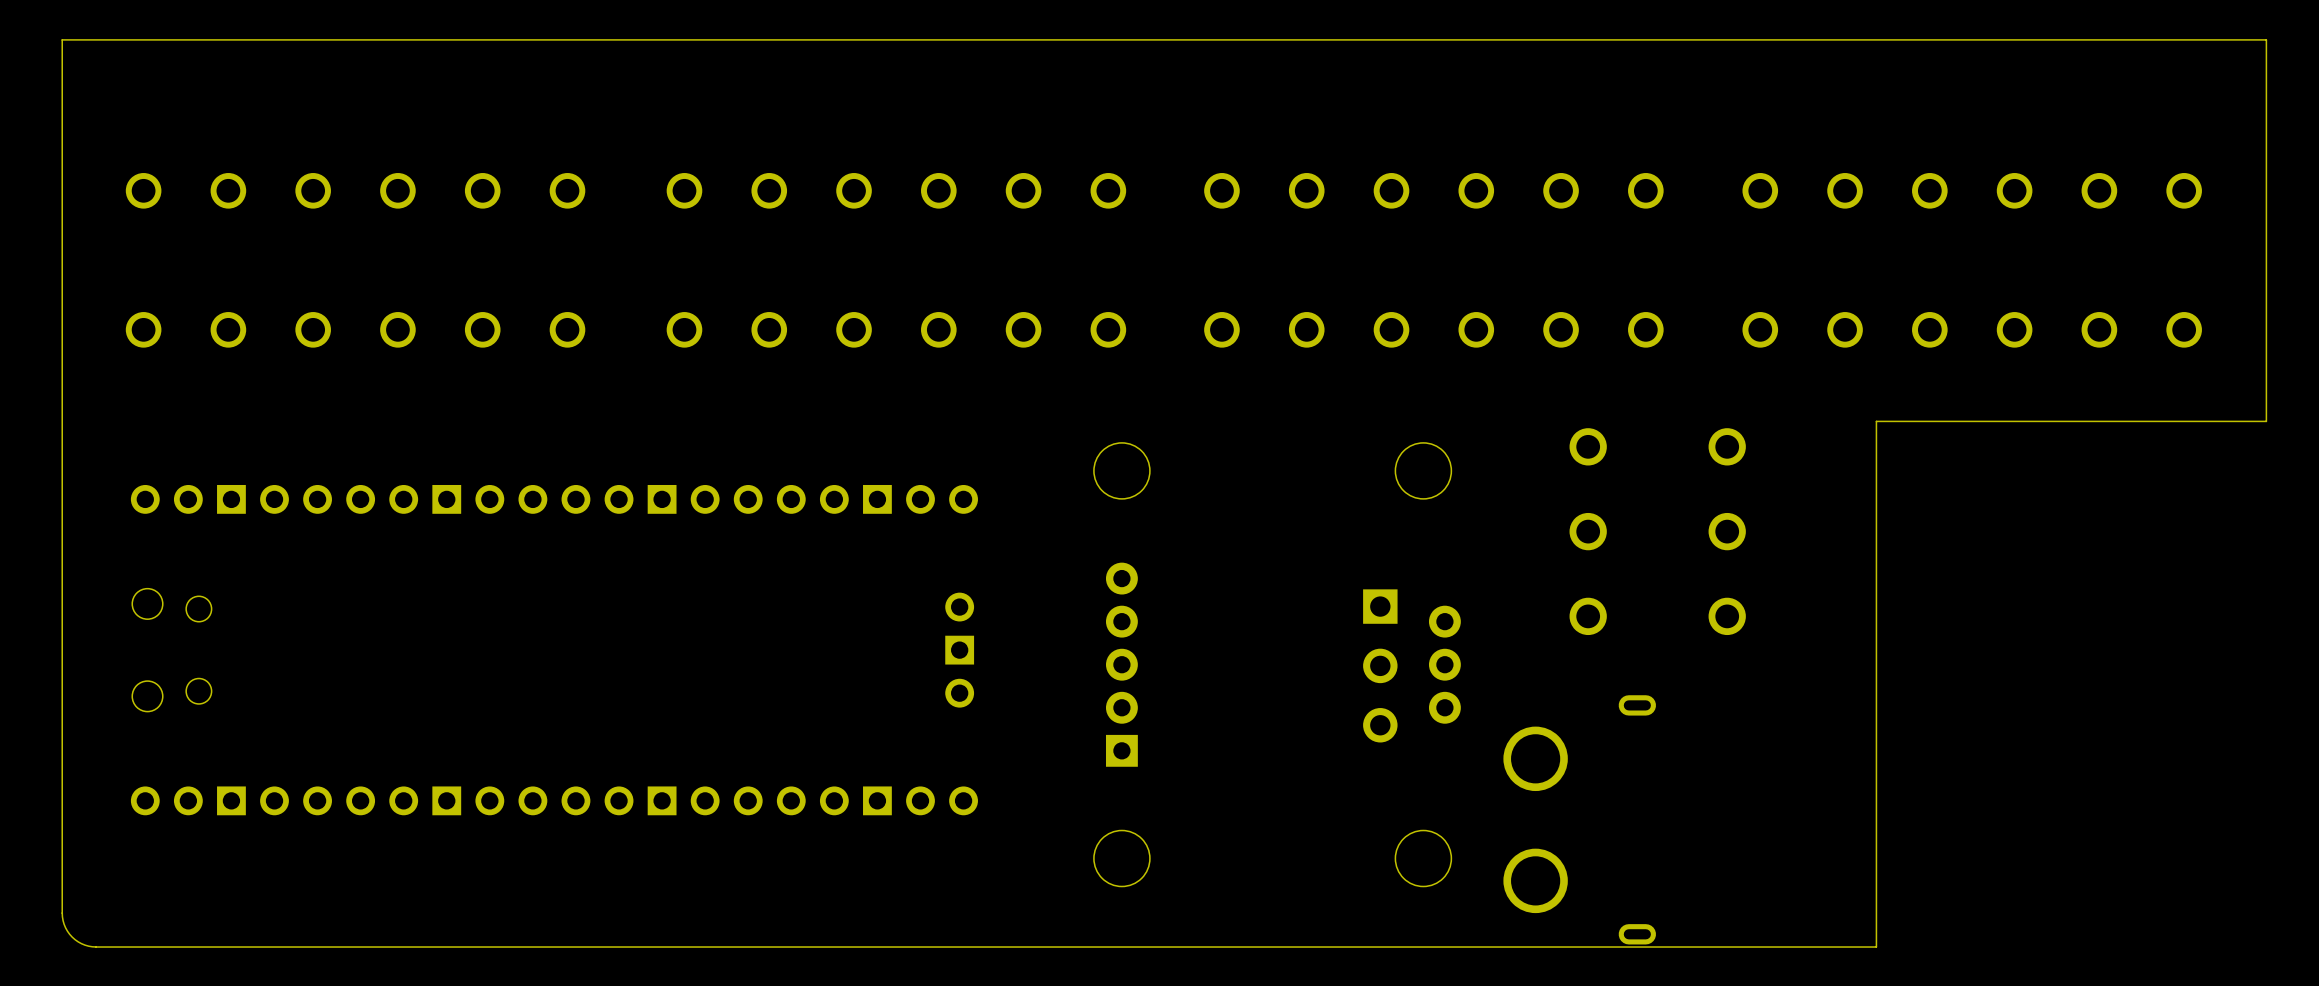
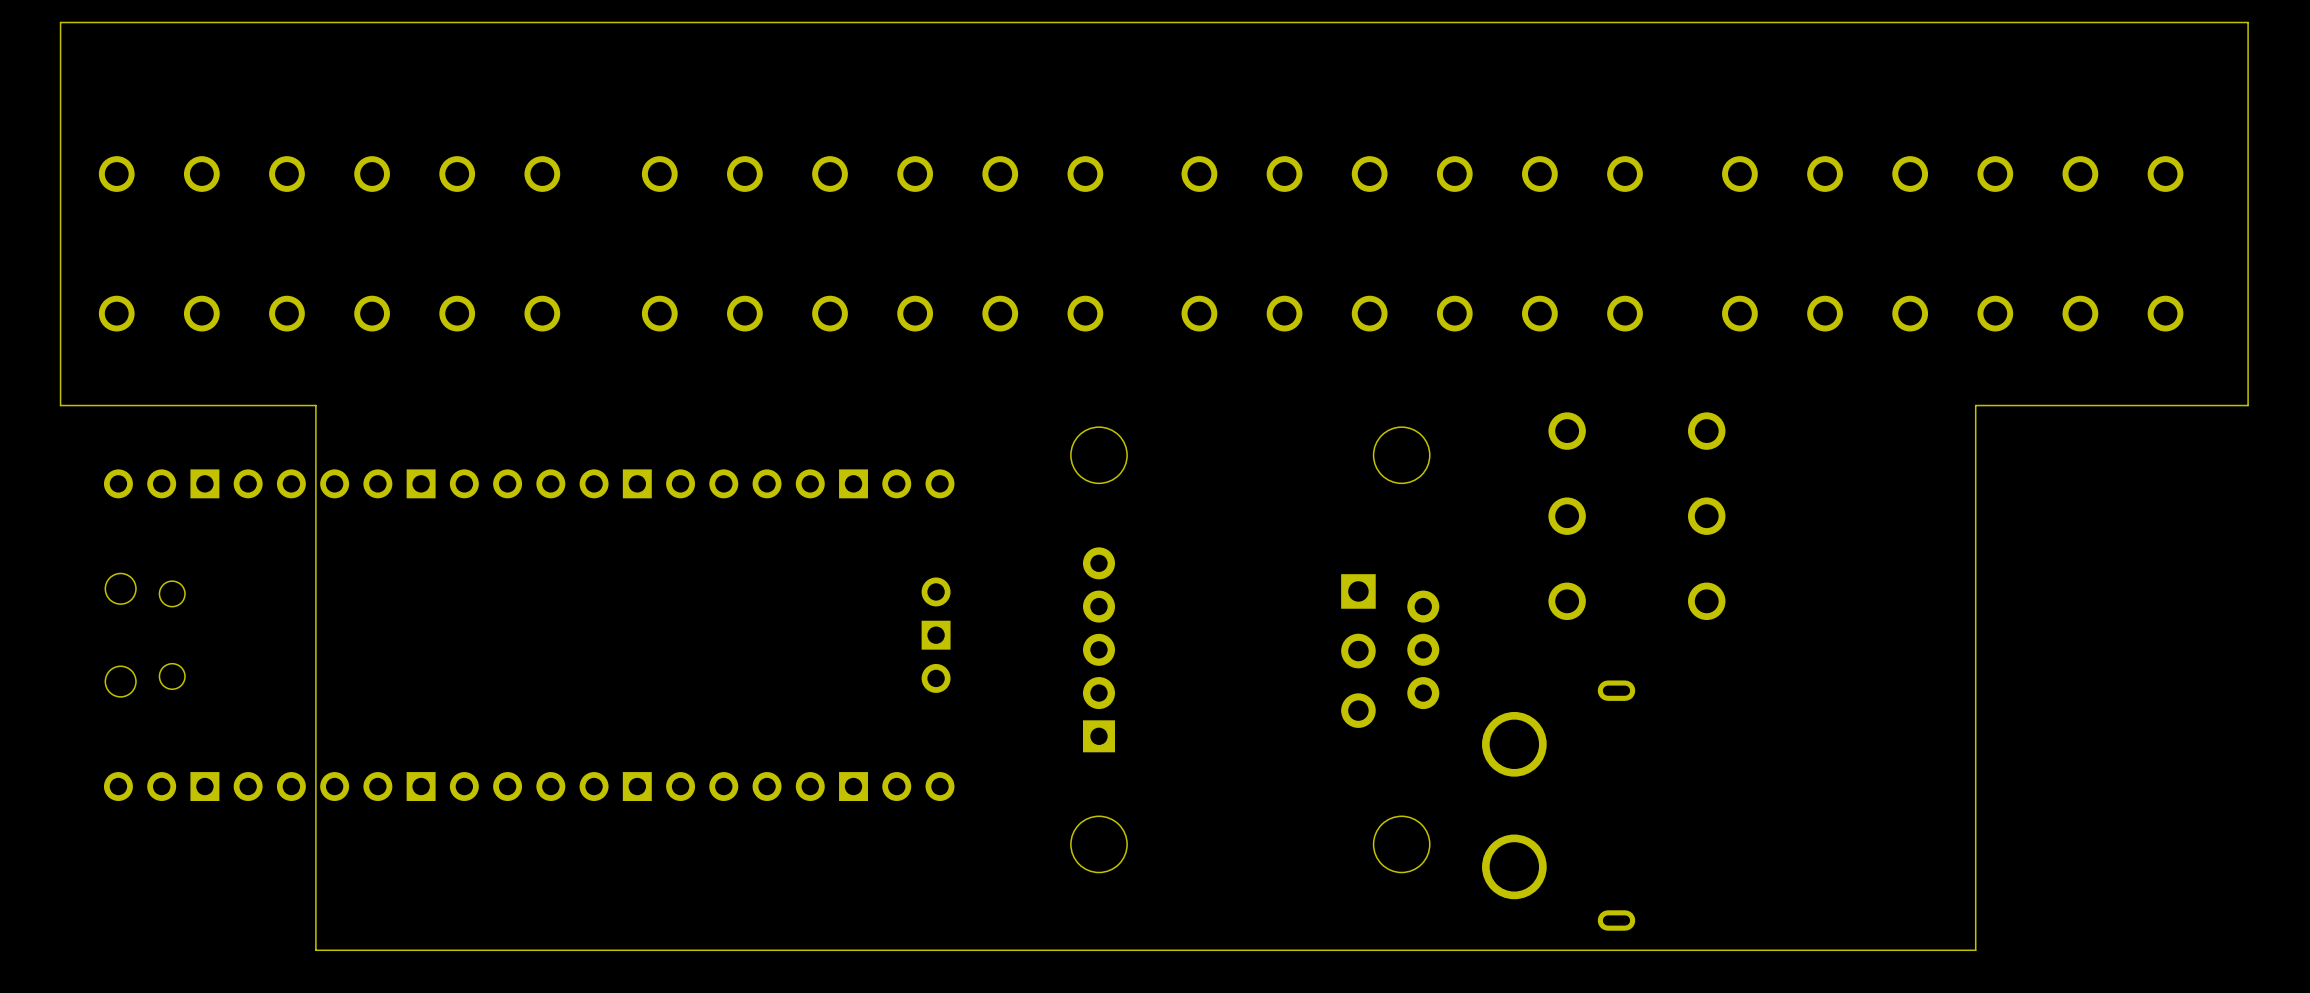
board edge: (87, 39) (62, 39) (62, 913) (64, 924) (69, 934) (78, 941) (88, 946) (1876, 947) (1876, 421) (1995, 421) -> (60, 22) (60, 405) (315, 405) (315, 950) (1975, 950) (1975, 405)

